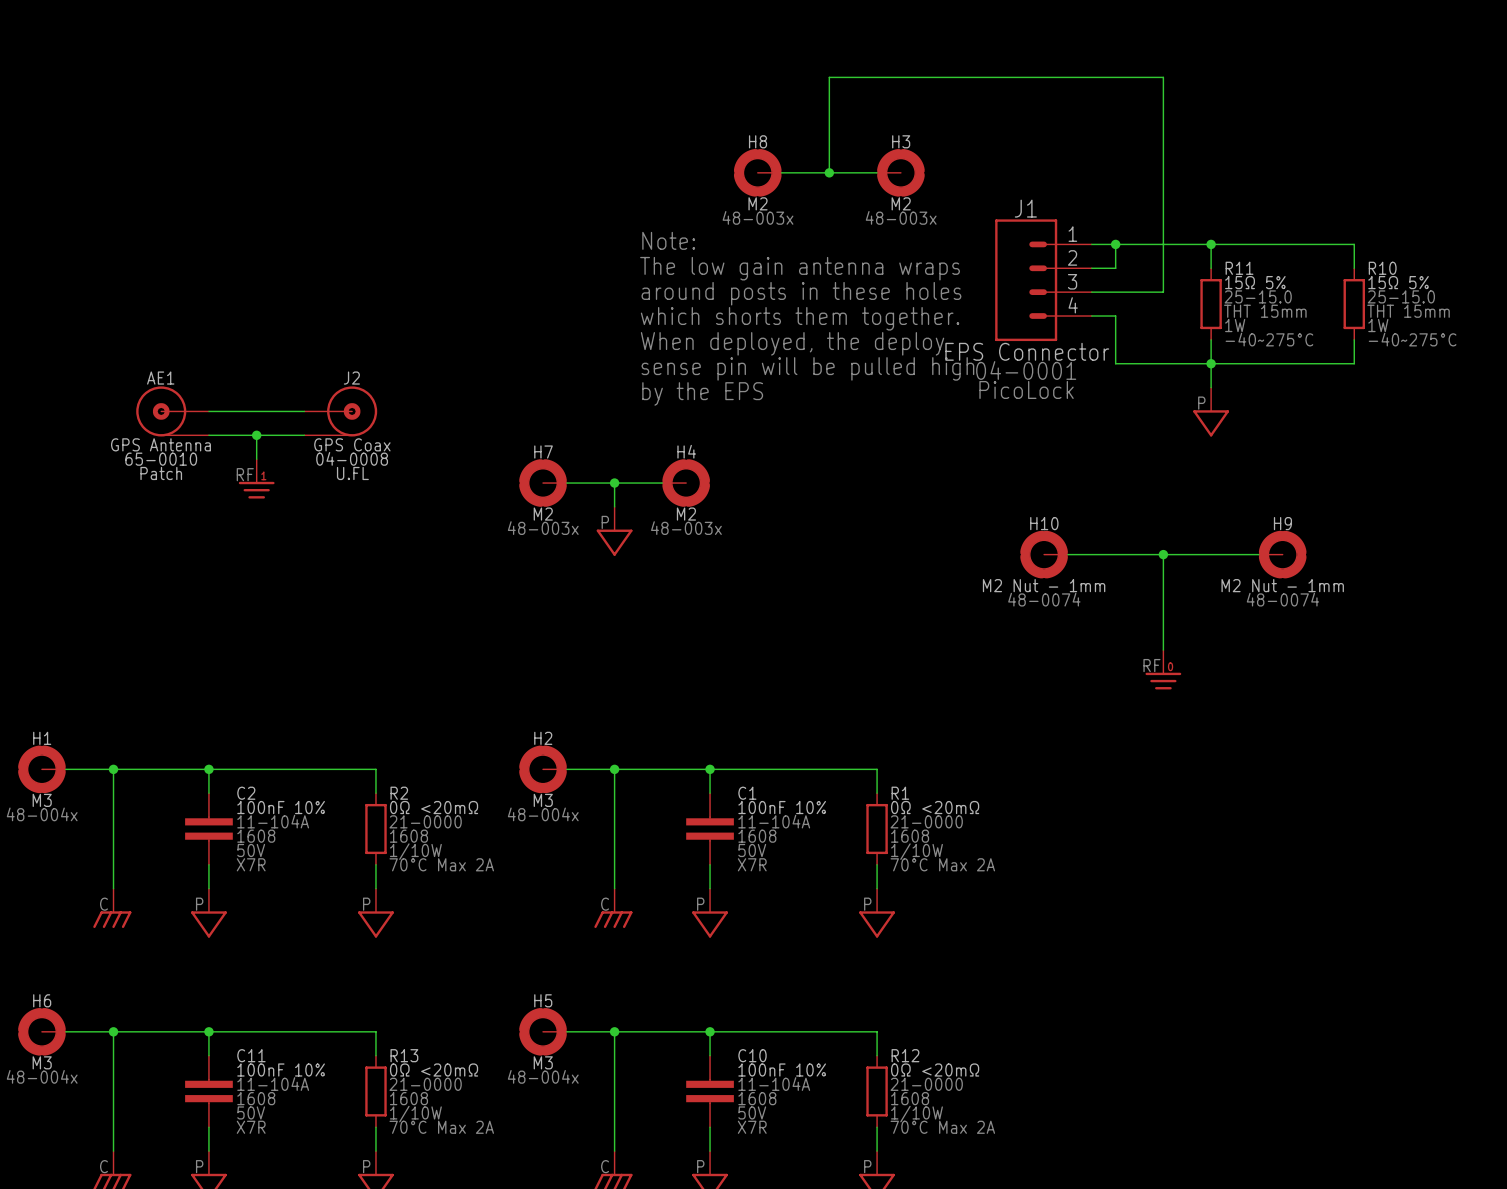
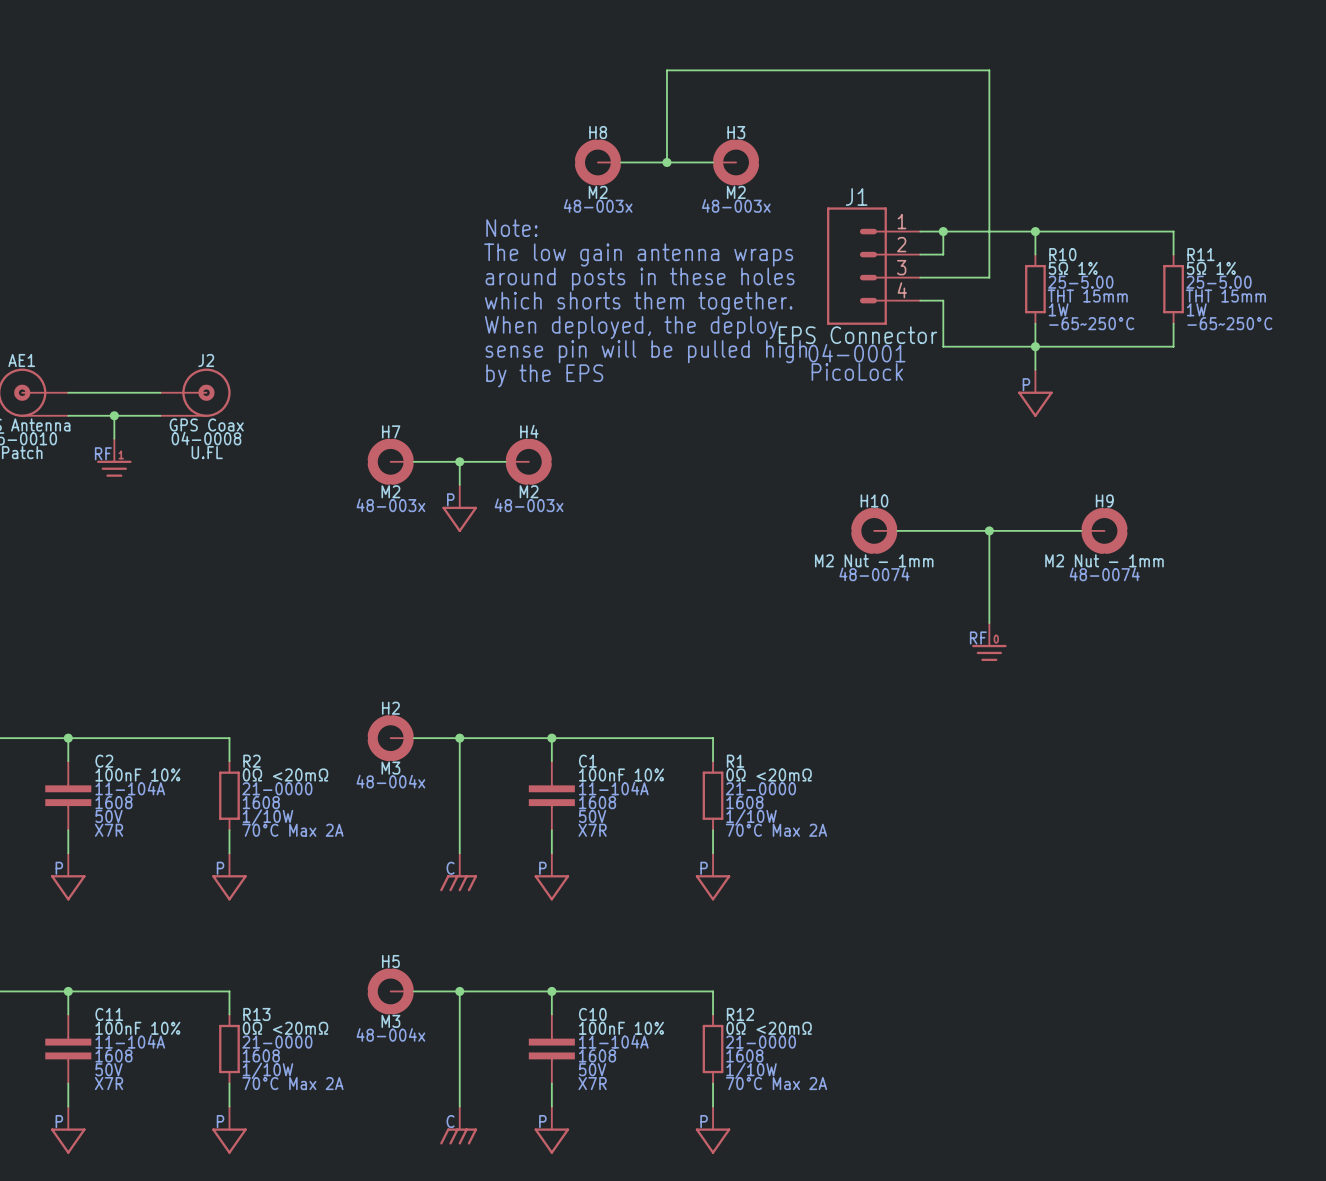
R11 name: R11 (1239, 268) -> R10 (1062, 254)
R10 name: R10 (1382, 268) -> R11 (1200, 254)
R11 value: 15Ω 5% (1255, 282) -> 5Ω 1% (1073, 268)
R10 value: 15Ω 5% (1398, 282) -> 5Ω 1% (1211, 268)
R11 text: 25-15.0 (1258, 296) -> 25-5.00 (1080, 282)
R10 text: 25-15.0 (1401, 296) -> 25-5.00 (1219, 282)
R11 text: -40~275°C (1269, 339) -> -65~250°C (1091, 323)
R10 text: -40~275°C (1412, 339) -> -65~250°C (1229, 323)

